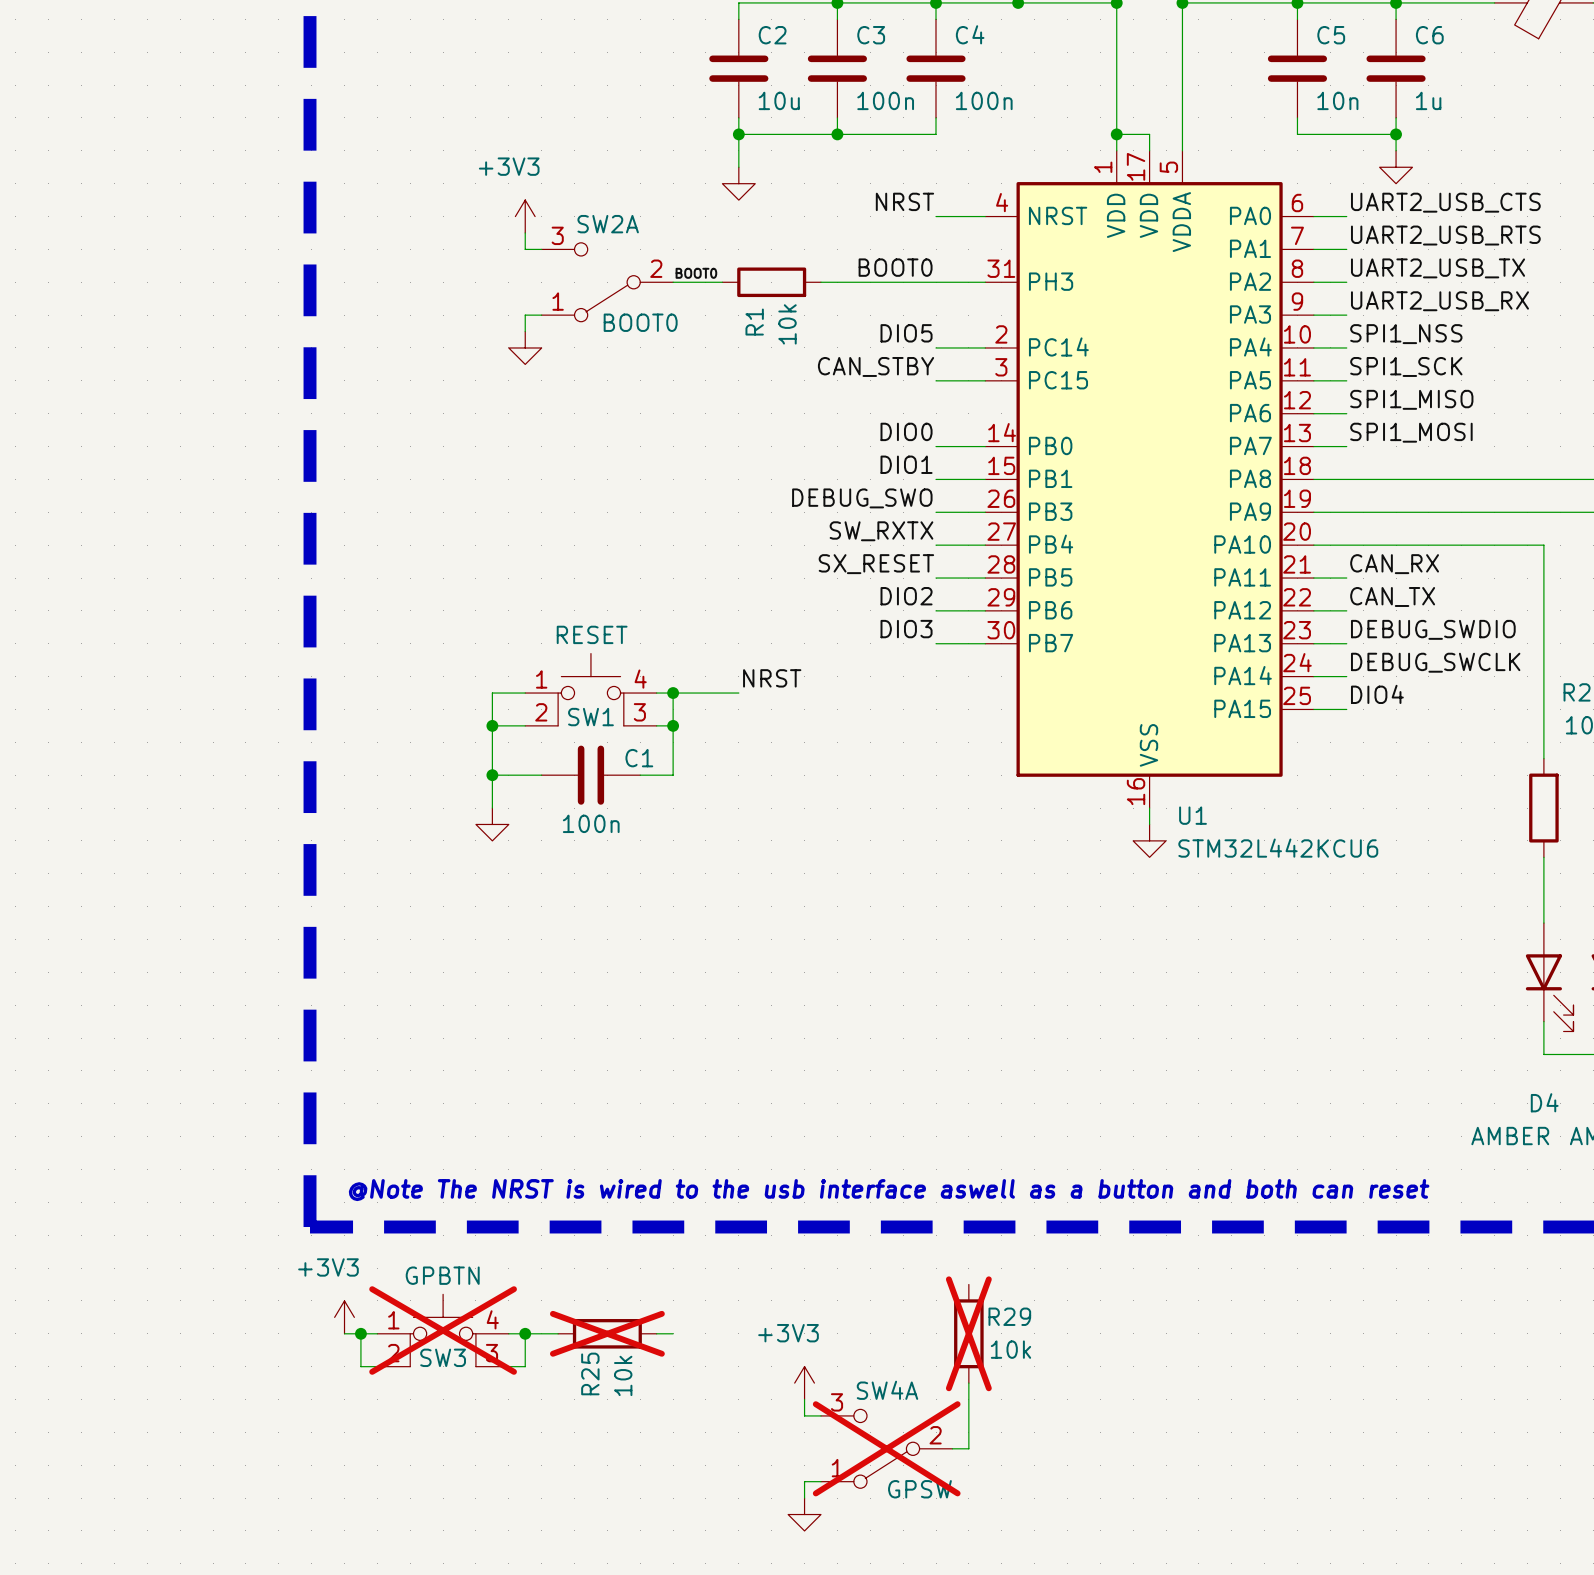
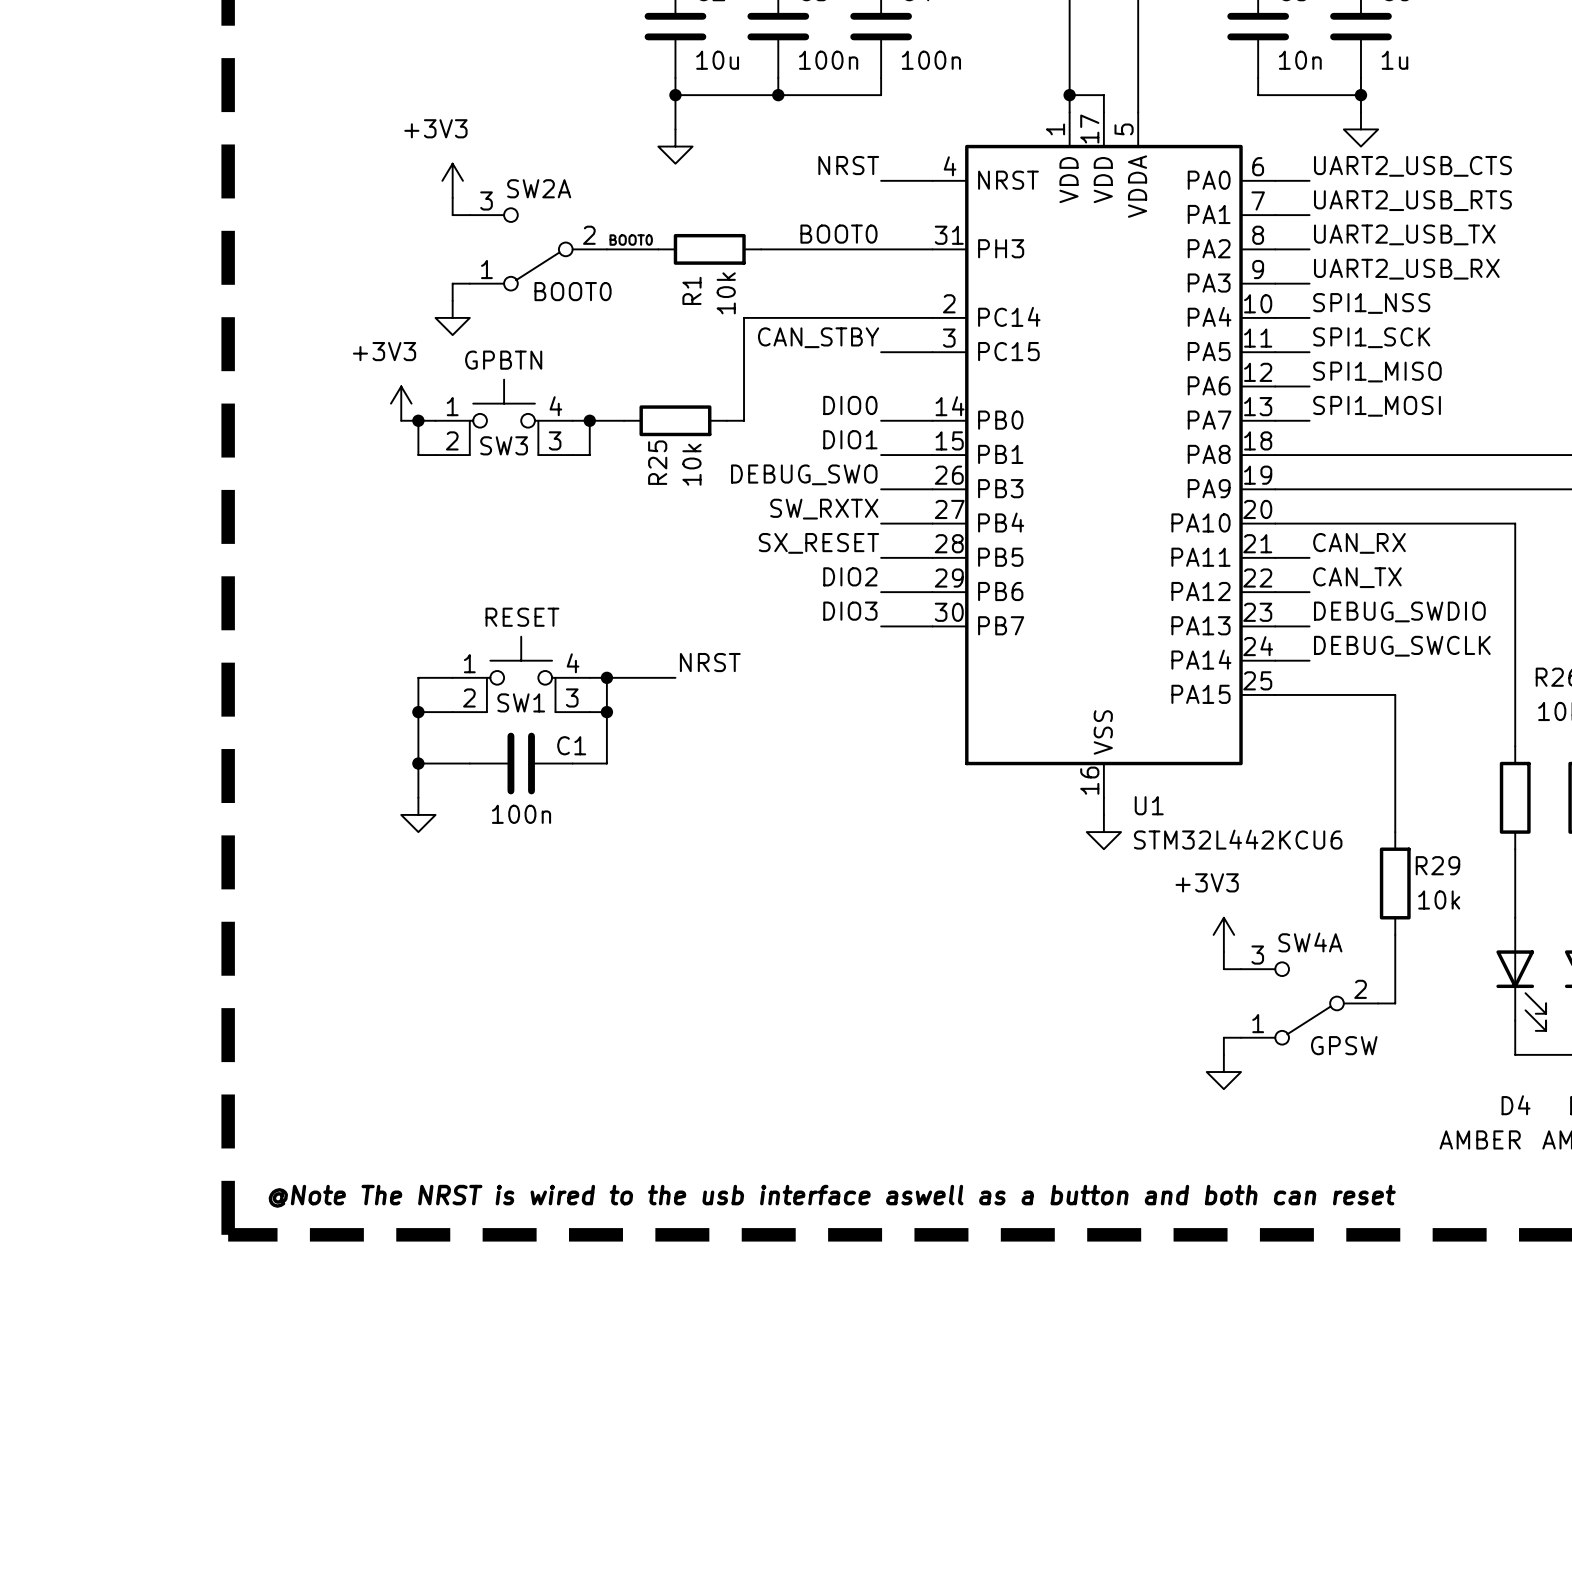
label: DIO5 (906, 333) -> none
wire: none -> (881, 317) (744, 317) (744, 420) (726, 420)
power symbol: none -> +3V3 (401, 403)
wire: none -> (401, 420) (435, 420)
wire: none -> (418, 420) (418, 455) (435, 455)
junction: none -> (418, 420)
wire: none -> (572, 420) (624, 420)
wire: none -> (589, 420) (589, 455) (572, 455)
junction: none -> (589, 420)
label: DIO4 (1377, 694) -> none
wire: none -> (1309, 694) (1395, 694) (1395, 832)
power symbol: none -> +3V3 (1223, 934)
wire: none -> (1395, 934) (1395, 1003) (1378, 1003)
wire: none -> (1223, 952) (1223, 969) (1241, 969)
wire: none -> (1241, 1037) (1223, 1037) (1223, 1054)
power symbol: none -> (1223, 1072)
power symbol: +3V3 (344, 1317) -> none
SW3 position: (443, 1330) -> (504, 417)
SW3 do-not-place cross: (443, 1330) -> none
wire: (344, 1333) (377, 1333) -> none
wire: (360, 1333) (360, 1366) (377, 1366) -> none
junction: (360, 1333) -> none
wire: (508, 1333) (558, 1333) -> none
wire: (525, 1333) (525, 1366) (508, 1366) -> none
junction: (525, 1333) -> none
R25 position: (607, 1333) -> (675, 420)
R25 do-not-place cross: (607, 1333) -> none
wire: (656, 1333) (673, 1333) -> none
R29 position: (968, 1333) -> (1395, 883)
R29 do-not-place cross: (968, 1333) -> none
power symbol: +3V3 (804, 1383) -> none
wire: (968, 1383) (968, 1448) (952, 1448) -> none
wire: (804, 1399) (804, 1415) (820, 1415) -> none
SW4A position: (886, 1448) -> (1309, 1003)
SW4A do-not-place cross: (886, 1448) -> none
wire: (820, 1481) (804, 1481) (804, 1498) -> none
power symbol: (804, 1514) -> none

